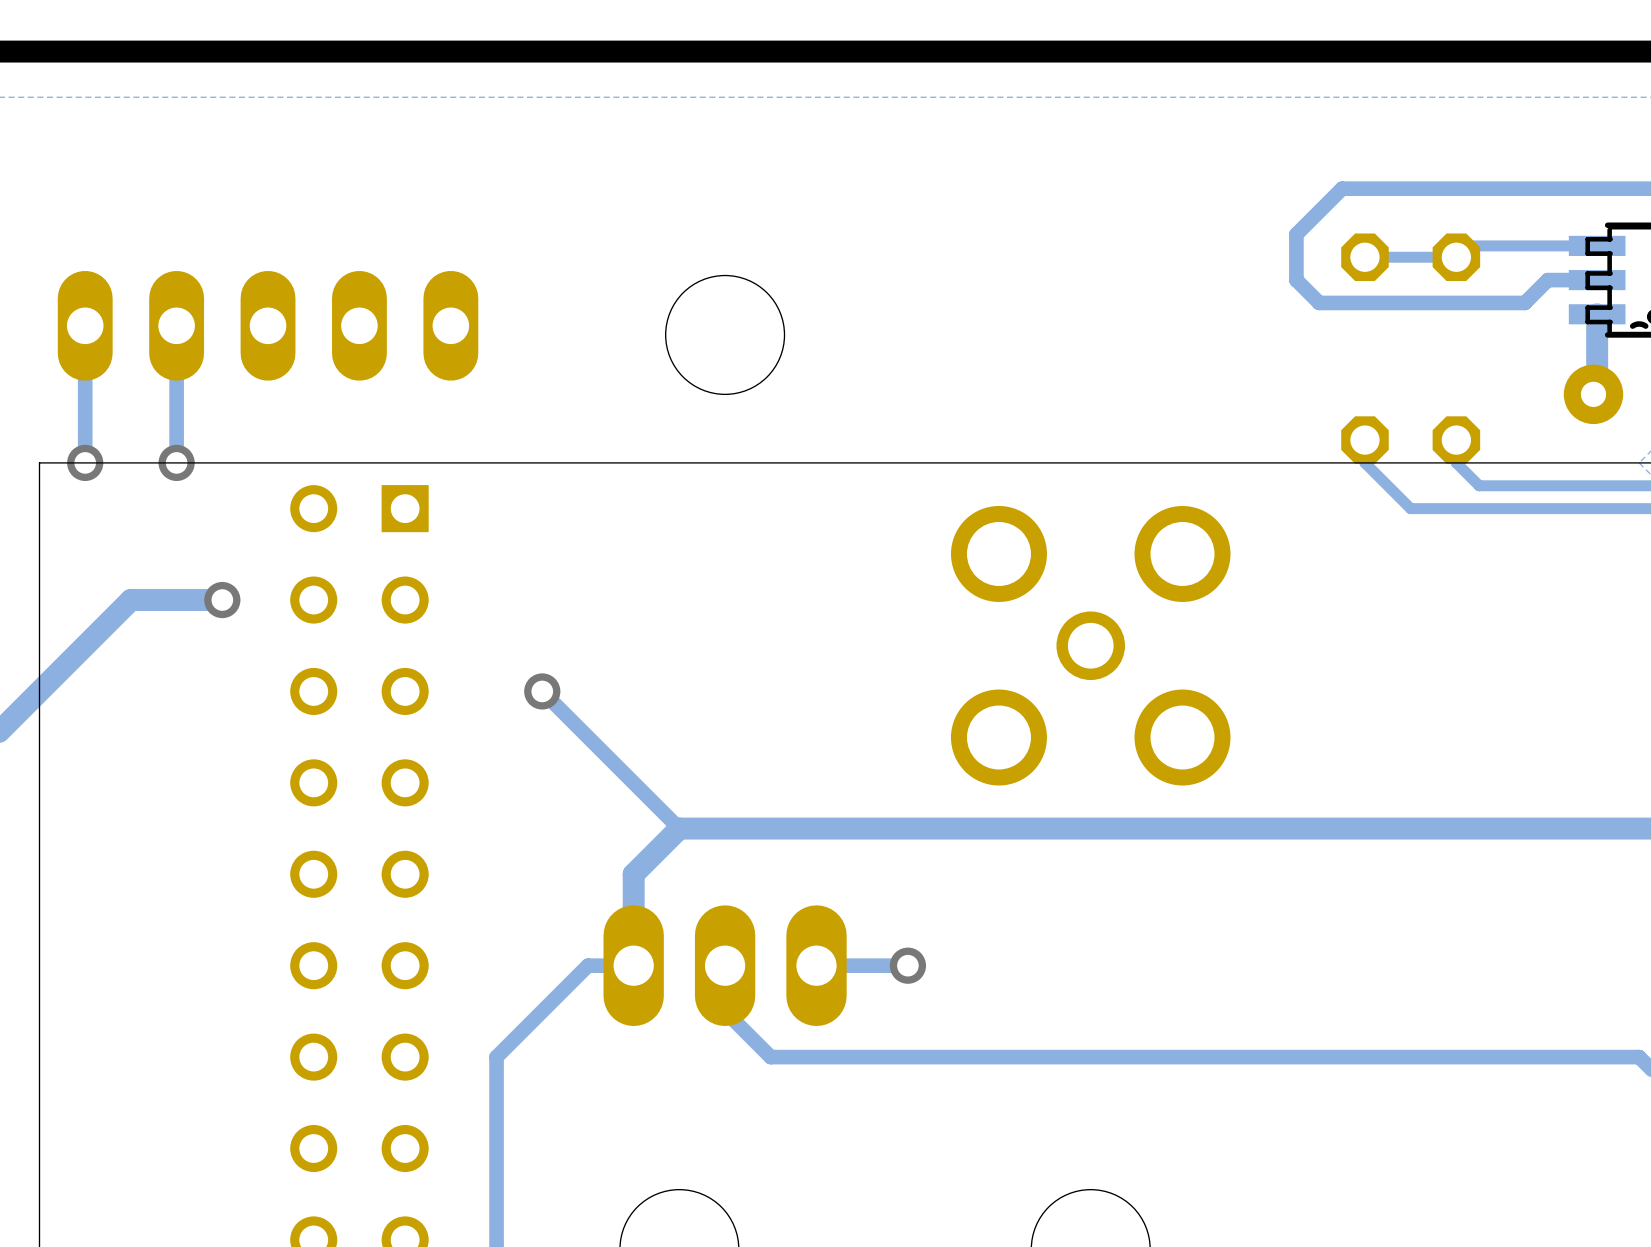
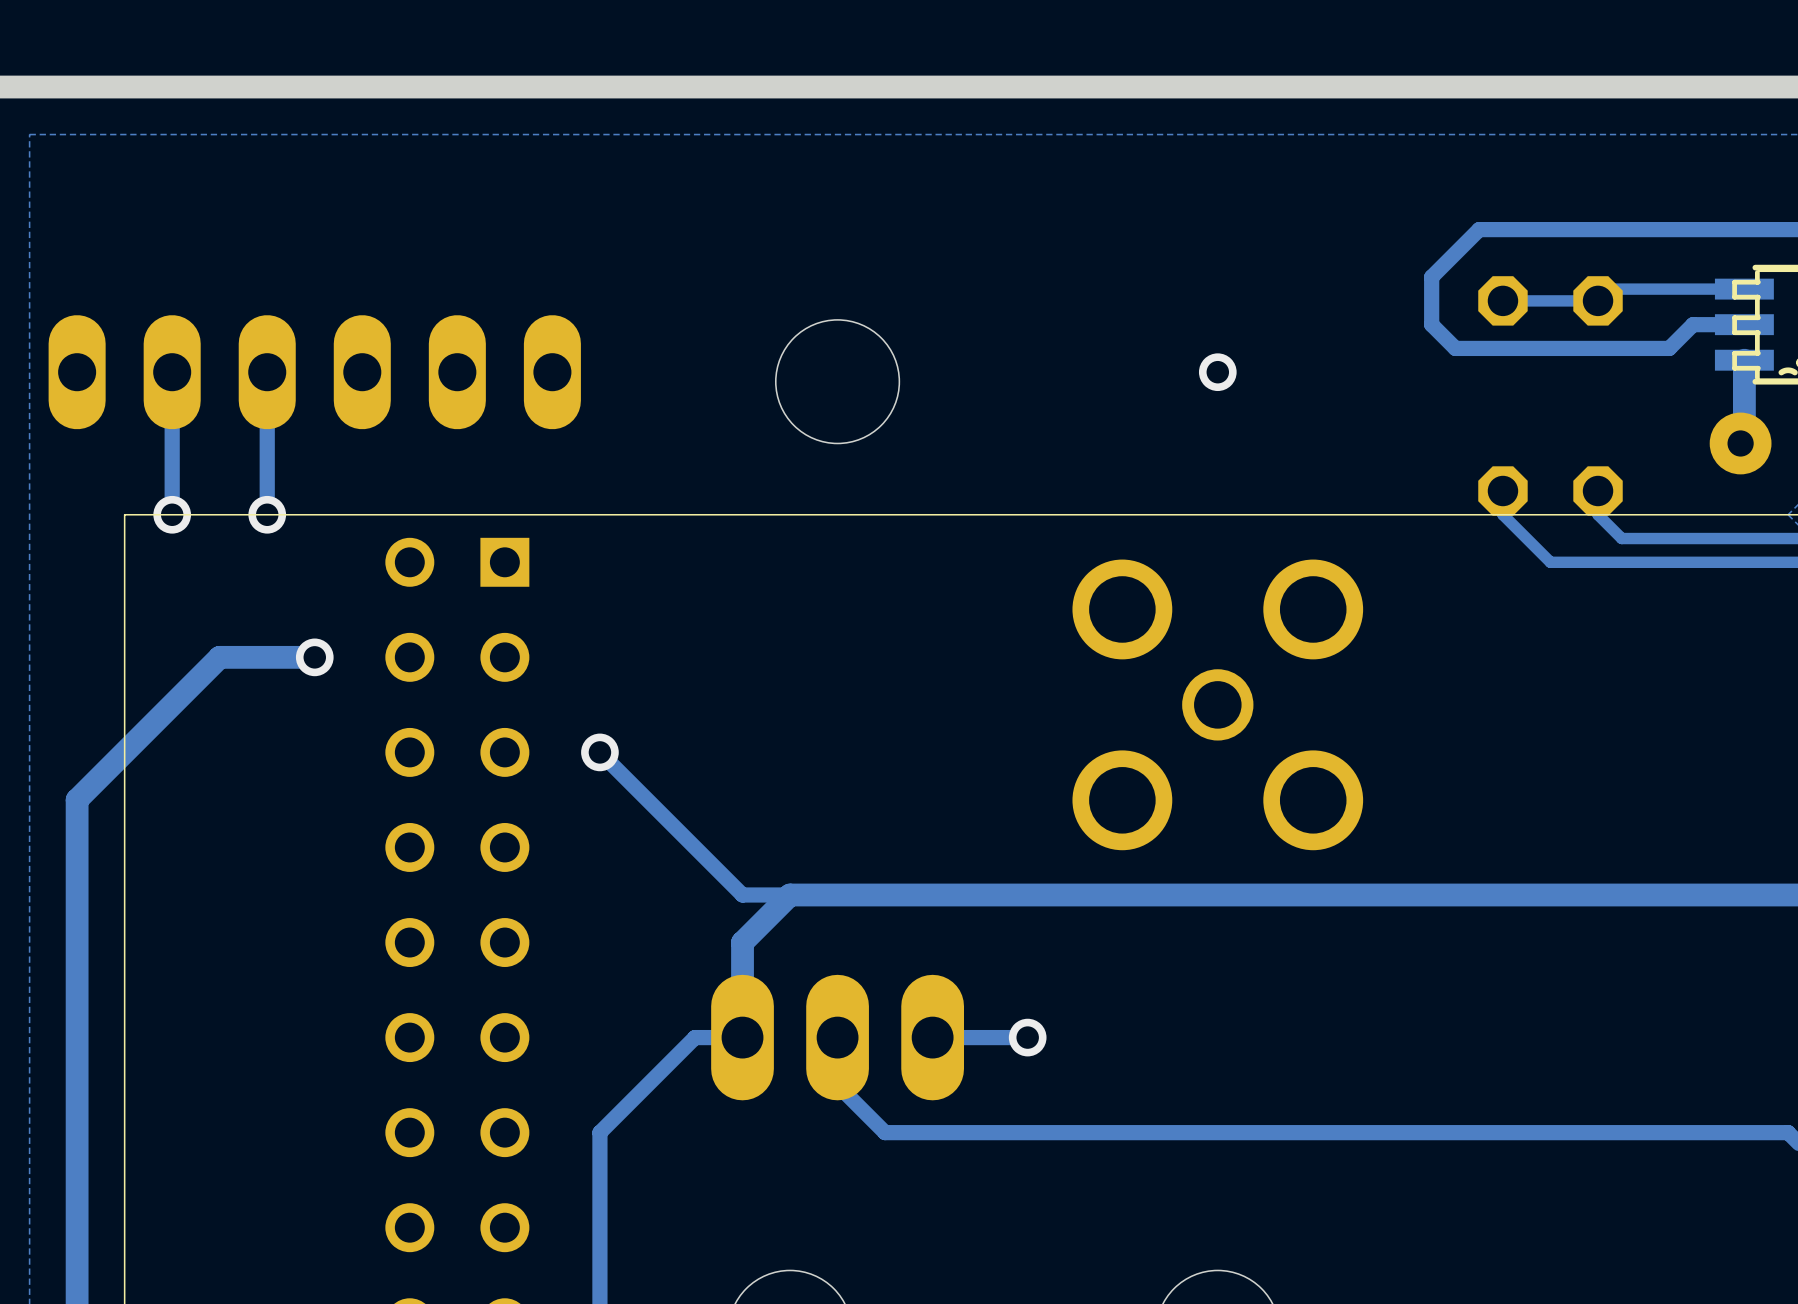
via: none -> (1217, 372)
track: (542, 691) (679, 828) -> (599, 752) (742, 894) (790, 894)
via position: (542, 691) -> (599, 752)

